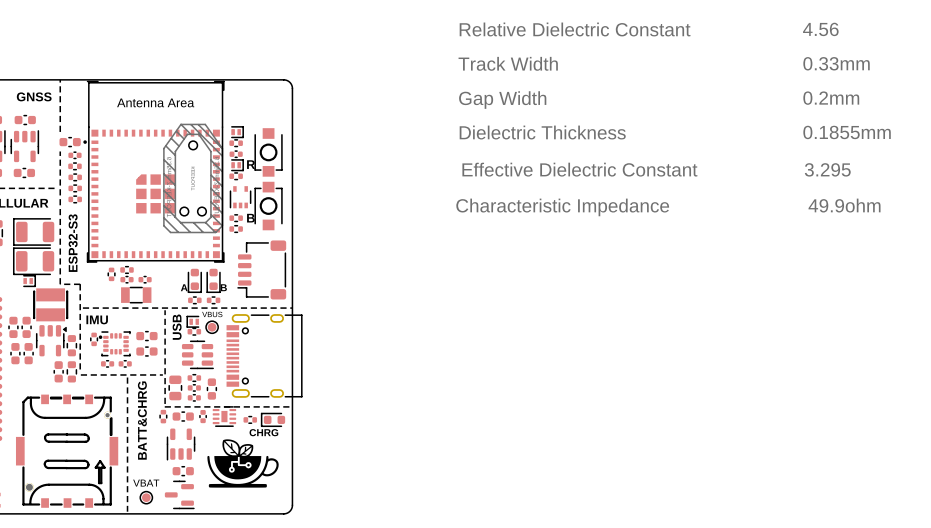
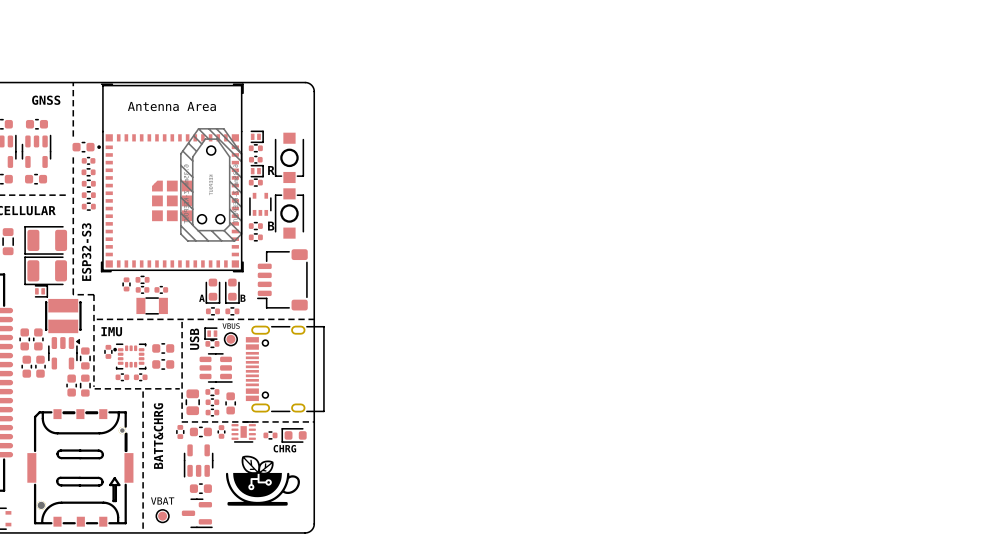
text: Relative Dielectric Constant (575, 29) -> none
text: 4.56 (820, 29) -> none
text: Track Width (508, 63) -> none
text: 0.33mm (836, 63) -> none
text: 0.2mm (831, 98) -> none
text: Gap Width (502, 100) -> none
text: Dielectric Thickness (542, 132) -> none
text: 0.1855mm (847, 132) -> none
text: Effective Dielectric Constant (579, 169) -> none
text: 3.295 (827, 169) -> none
text: 49.9ohm (844, 205) -> none
text: Characteristic Impedance (562, 207) -> none

